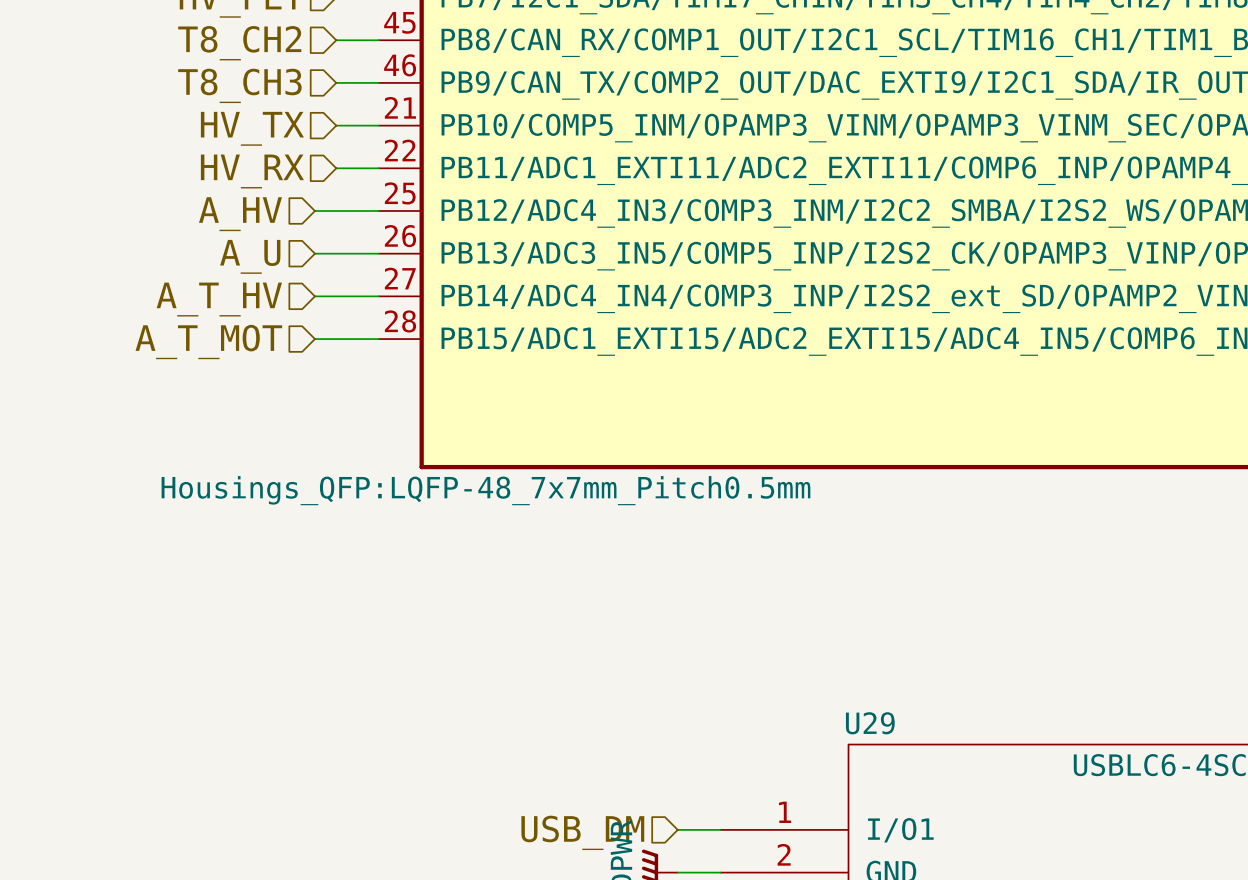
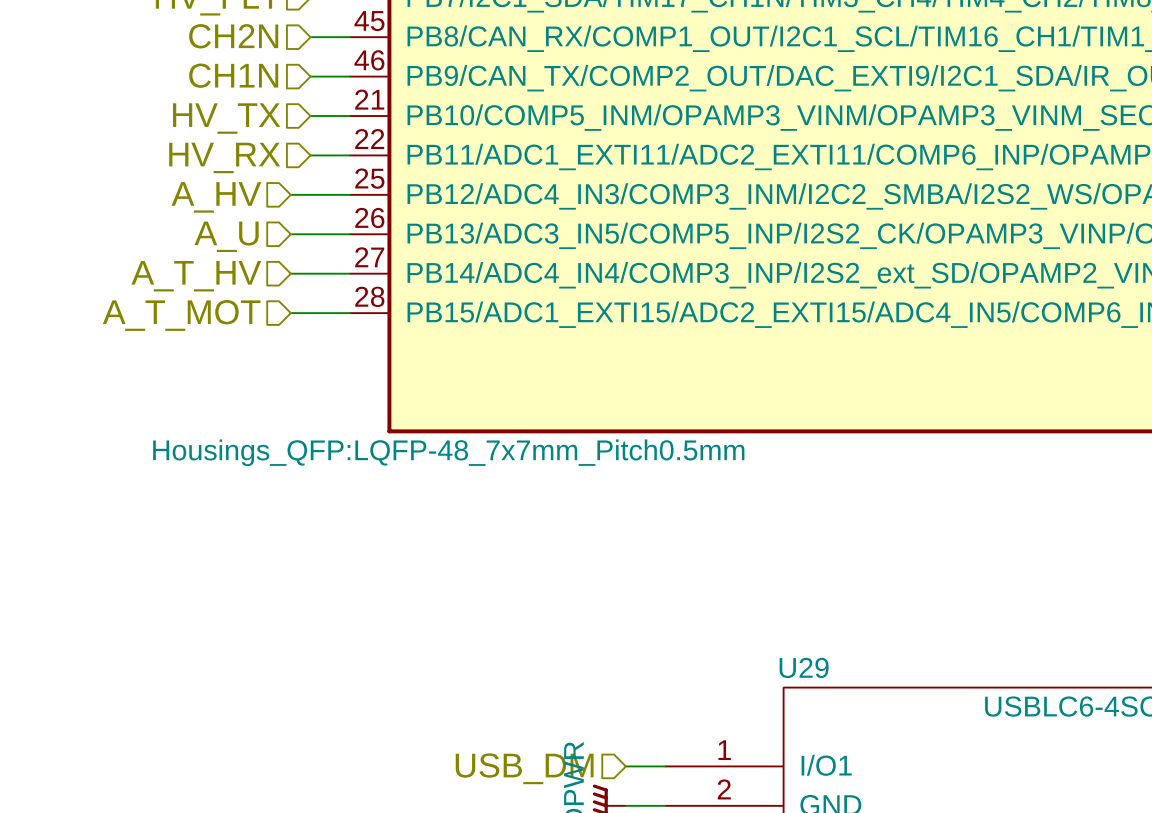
hierarchical label: T8_CH2 (239, 43) -> CH2N (233, 36)
hierarchical label: T8_CH3 (239, 85) -> CH1N (233, 75)

